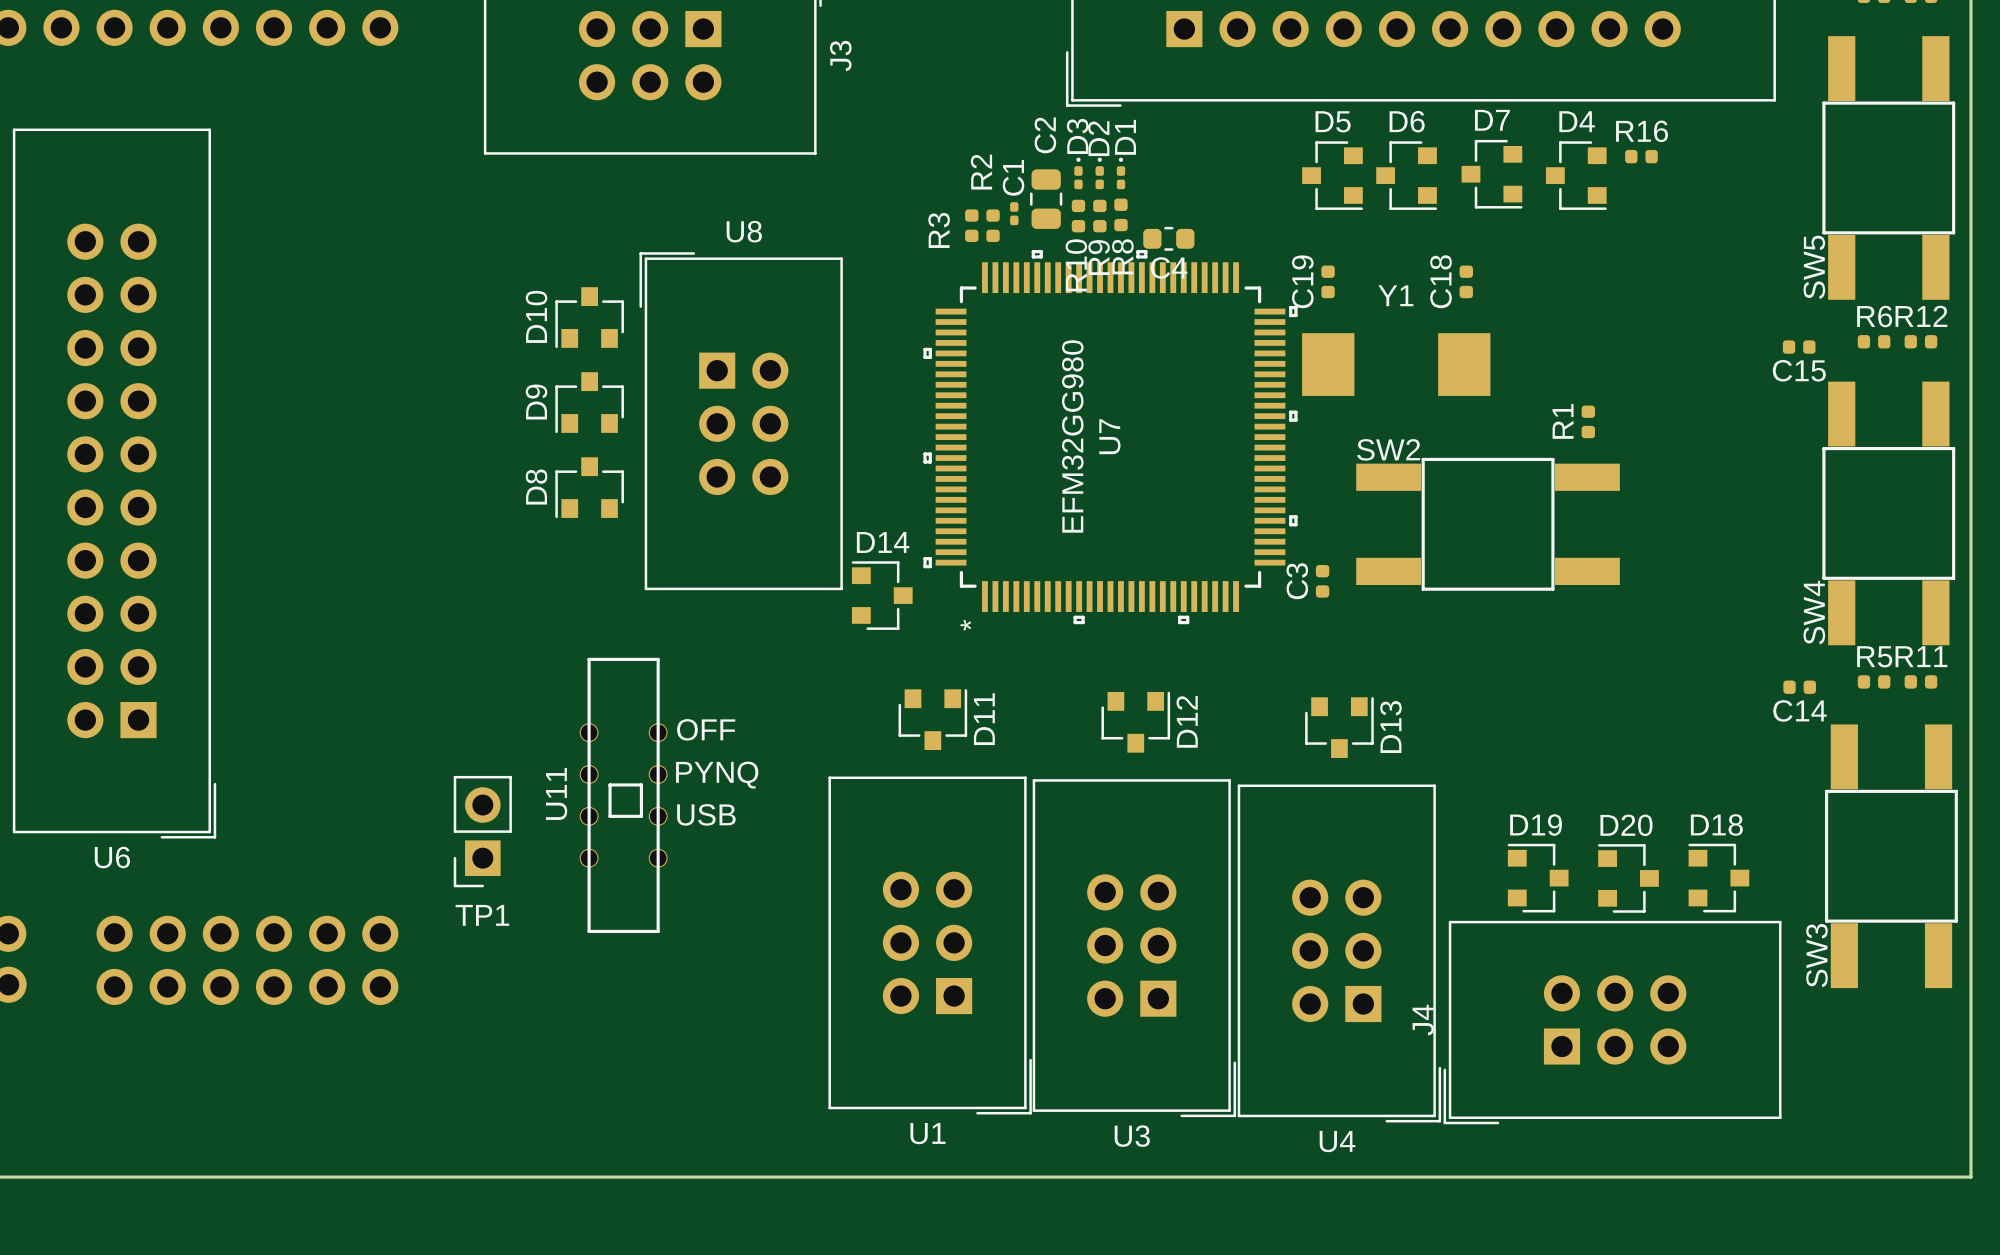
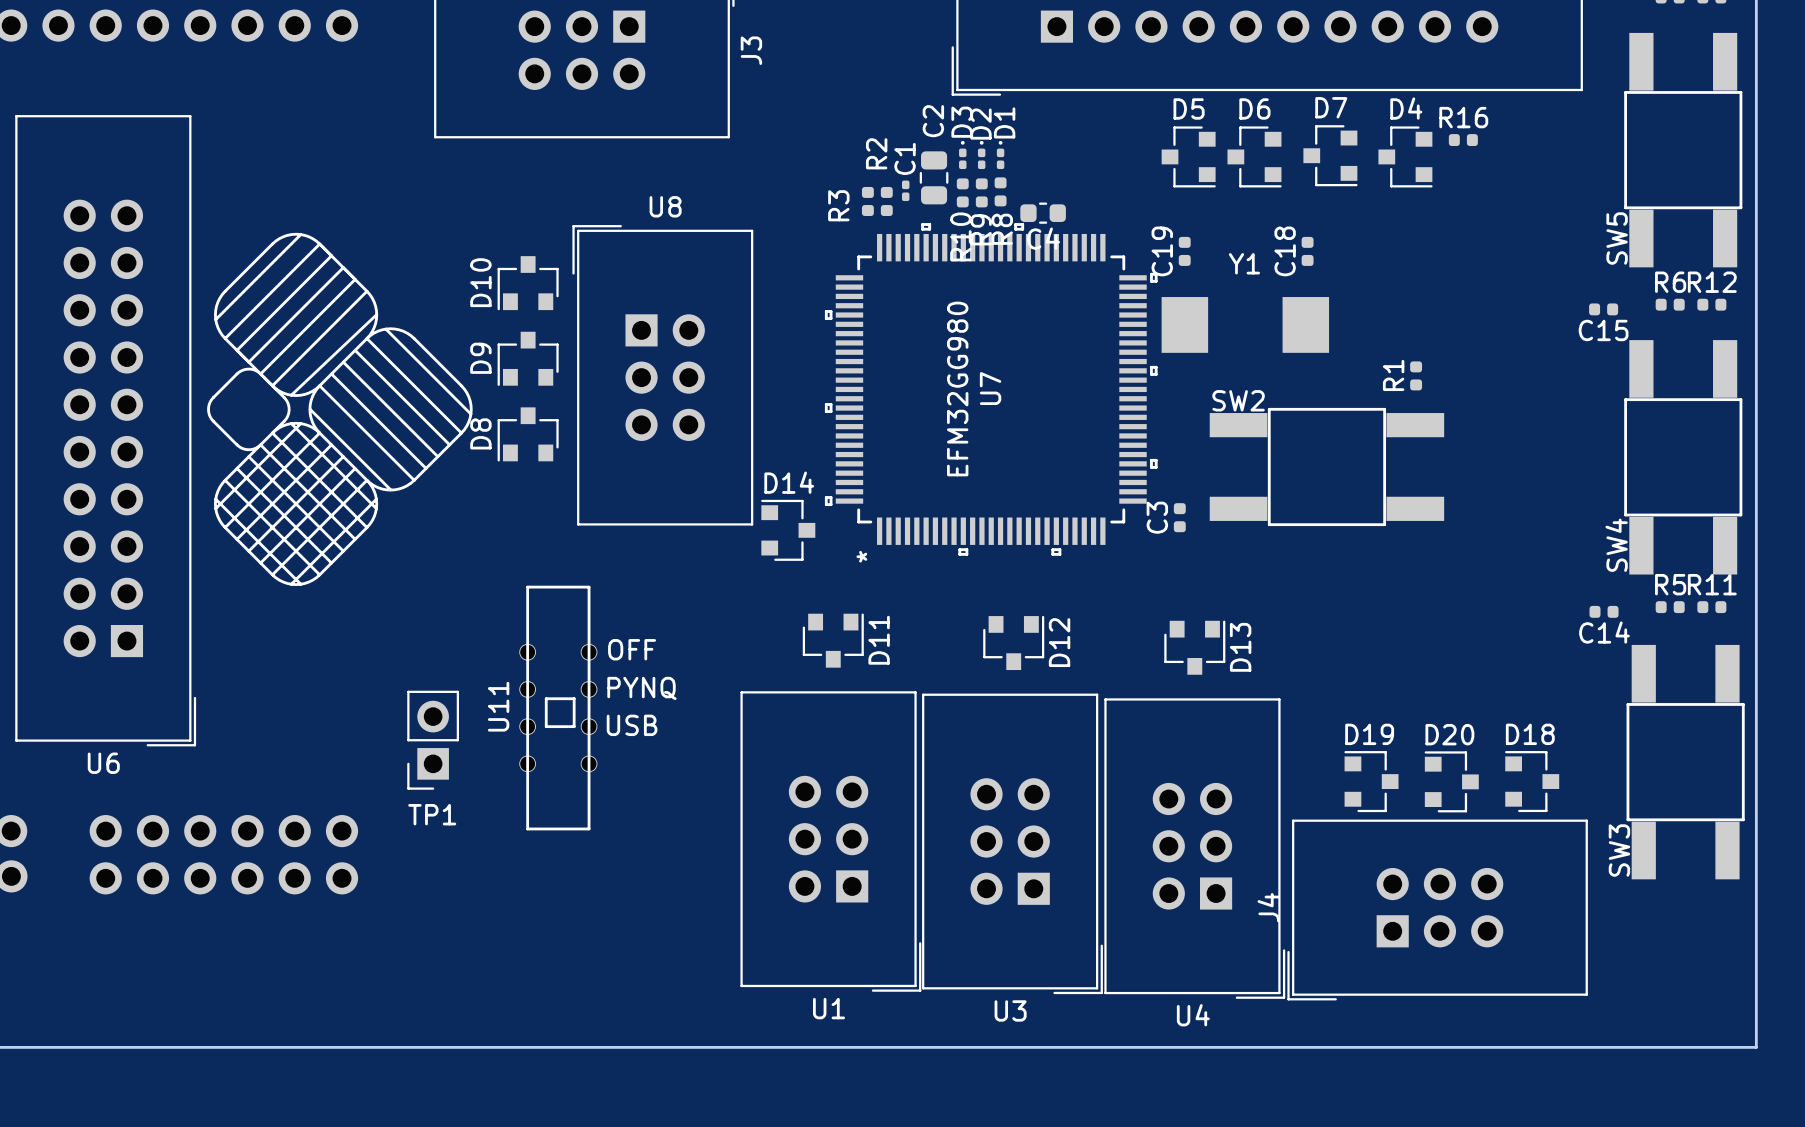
line: none -> (300, 234) (215, 319)
line: none -> (319, 244) (366, 291)
line: none -> (319, 244) (225, 338)
line: none -> (319, 244) (308, 236) (300, 234) (287, 235) (279, 238) (225, 291) (217, 302) (215, 314) (217, 327) (225, 338)
line: none -> (331, 255) (237, 350)
line: none -> (343, 267) (248, 362)
line: none -> (355, 279) (260, 373) (248, 369) (238, 372) (211, 399) (208, 409) (211, 419) (238, 446) (251, 449) (260, 444) (355, 539)
line: none -> (366, 291) (272, 385) (283, 393) (296, 395) (308, 393) (319, 385)
line: none -> (366, 291) (374, 302) (376, 314) (374, 327) (366, 338)
line: none -> (376, 314) (291, 395)
line: none -> (385, 329) (470, 414)
line: none -> (225, 338) (284, 397) (289, 409) (284, 421) (225, 480)
line: none -> (366, 338) (319, 385)
line: none -> (366, 338) (461, 433)
line: none -> (366, 338) (377, 331) (386, 329) (399, 329) (407, 333) (461, 385) (468, 396) (471, 409) (468, 422) (461, 433)
line: none -> (355, 350) (449, 444)
line: none -> (343, 362) (437, 456)
line: none -> (331, 373) (426, 468)
line: none -> (319, 385) (414, 480)
line: none -> (319, 385) (312, 396) (309, 409) (312, 422) (319, 433)
line: none -> (310, 409) (390, 489)
line: none -> (291, 423) (376, 508)
line: none -> (300, 423) (215, 508)
line: none -> (319, 433) (366, 480)
line: none -> (319, 433) (225, 527)
line: none -> (319, 433) (308, 425) (296, 423) (283, 425) (272, 433) (366, 527)
line: none -> (461, 433) (414, 480)
line: none -> (331, 444) (237, 539)
line: none -> (248, 456) (343, 551)
line: none -> (343, 456) (248, 551)
line: none -> (237, 468) (331, 563)
line: none -> (355, 468) (260, 563)
line: none -> (225, 480) (319, 574)
line: none -> (225, 480) (217, 491) (215, 503) (217, 516) (225, 527)
line: none -> (366, 480) (272, 574)
line: none -> (366, 480) (374, 491) (376, 503) (374, 516) (366, 527)
line: none -> (366, 480) (377, 487) (390, 490) (403, 487) (414, 480)
line: none -> (215, 499) (300, 584)
line: none -> (376, 499) (291, 584)
line: none -> (225, 527) (272, 574)
line: none -> (366, 527) (319, 574)
line: none -> (272, 574) (283, 582) (296, 584) (308, 582) (319, 574)

